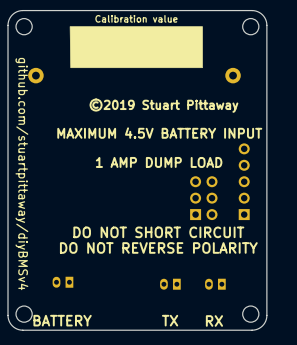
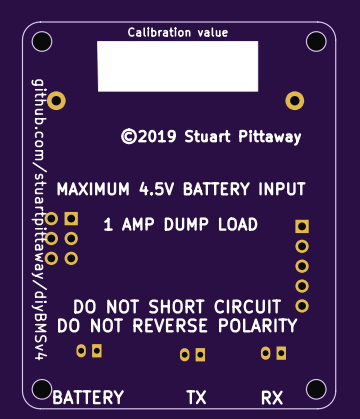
text position: MAXIMUM 4.5V BATTERY INPUT (159, 133) -> MAXIMUM 4.5V BATTERY INPUT (181, 188)
text position: 1 AMP DUMP LOAD (159, 162) -> 1 AMP DUMP LOAD (180, 224)
part rotation: 0° (244, 181) -> 180° (302, 266)
part: none -> (61, 238)
part: (203, 198) -> none
text position: DO NOT SHORT CIRCUIT (158, 232) -> DO NOT SHORT CIRCUIT (177, 306)
text position: DO NOT REVERSE POLARITY (158, 247) -> DO NOT REVERSE POLARITY (177, 325)
part position: (170, 284) -> (192, 354)
text position: TX (170, 320) -> TX (196, 397)

